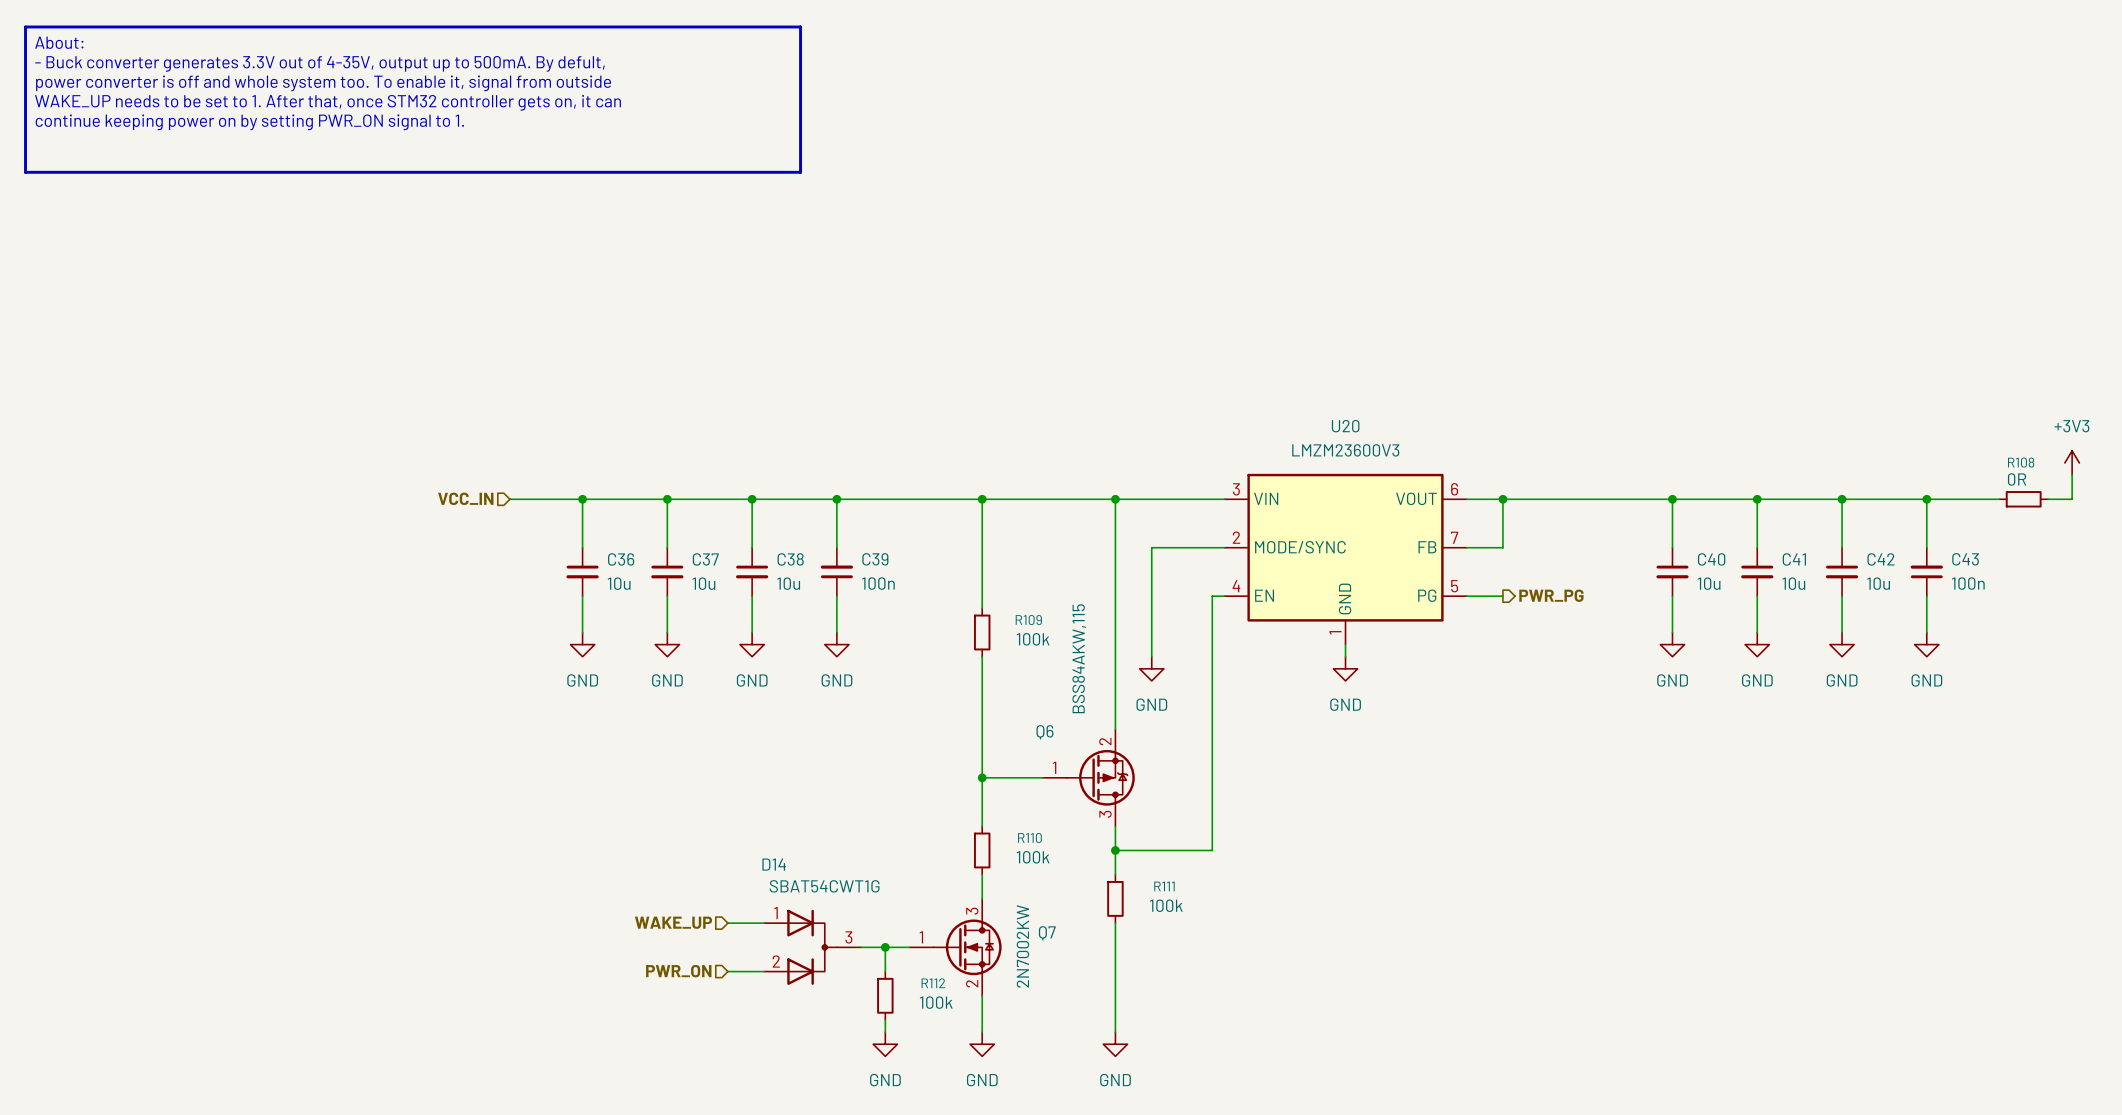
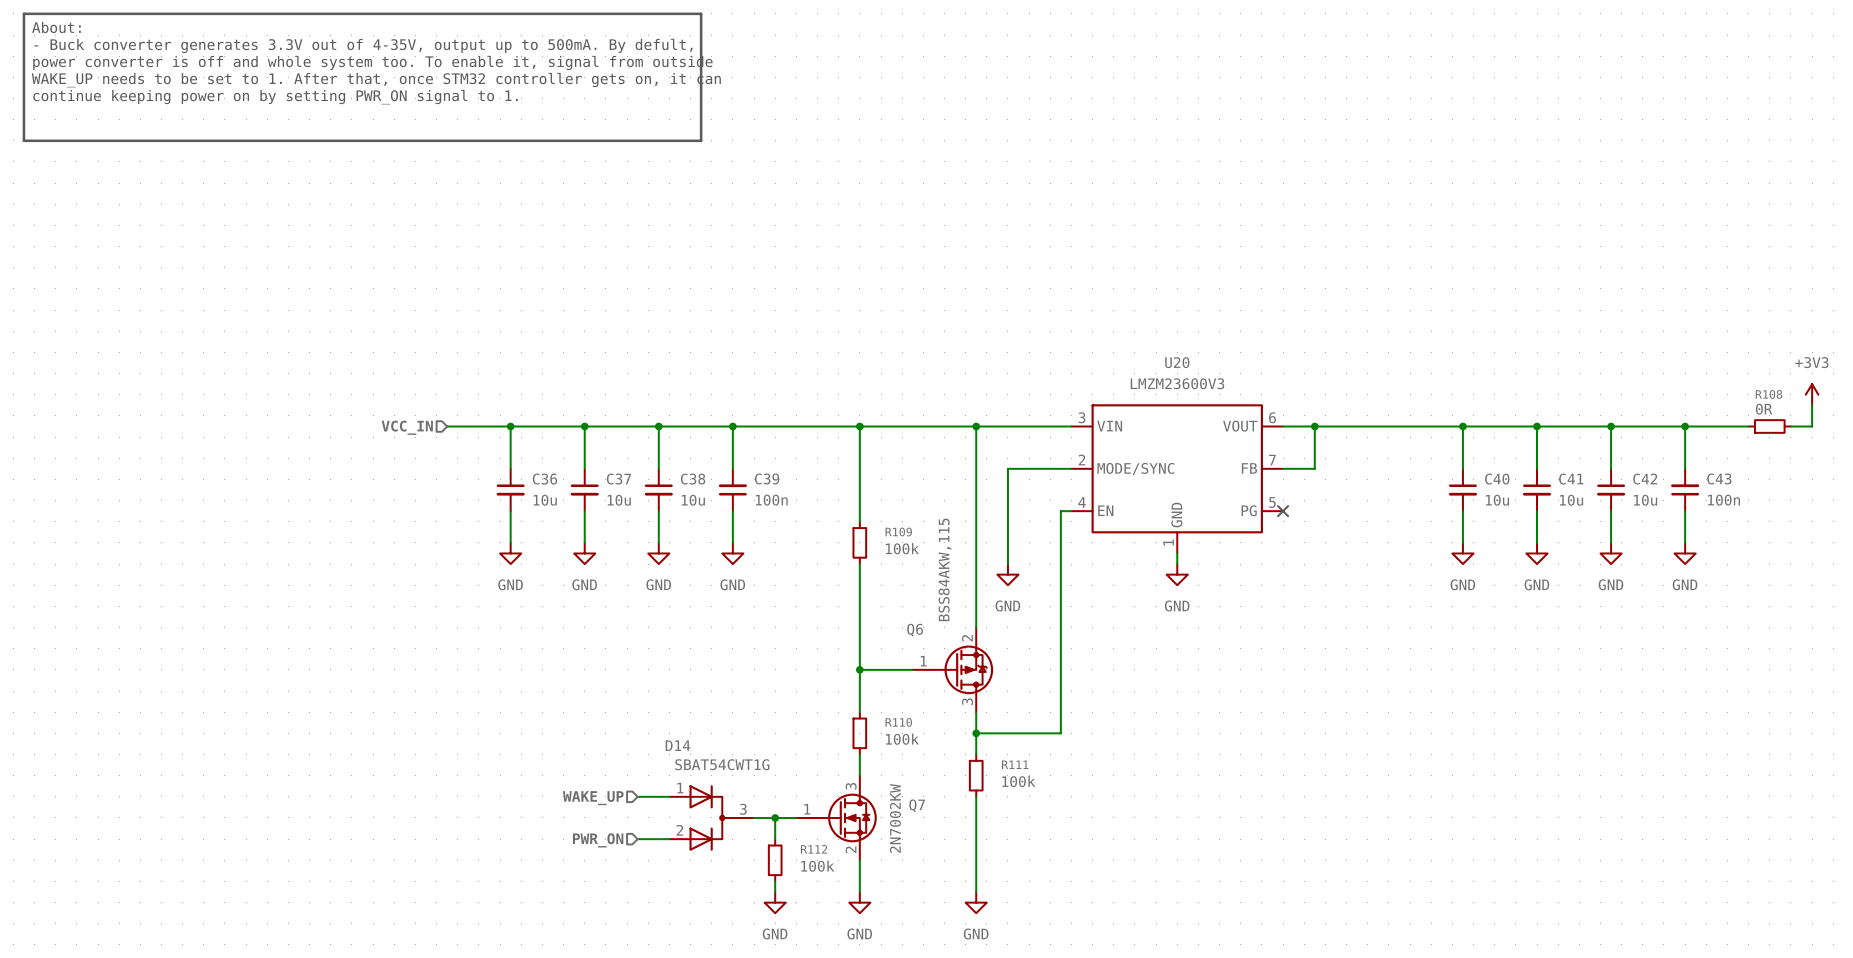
hierarchical label: PWR_PG (1551, 595) -> none
wire: (1466, 596) (1502, 596) -> none
no-connect mark: none -> (1283, 511)

